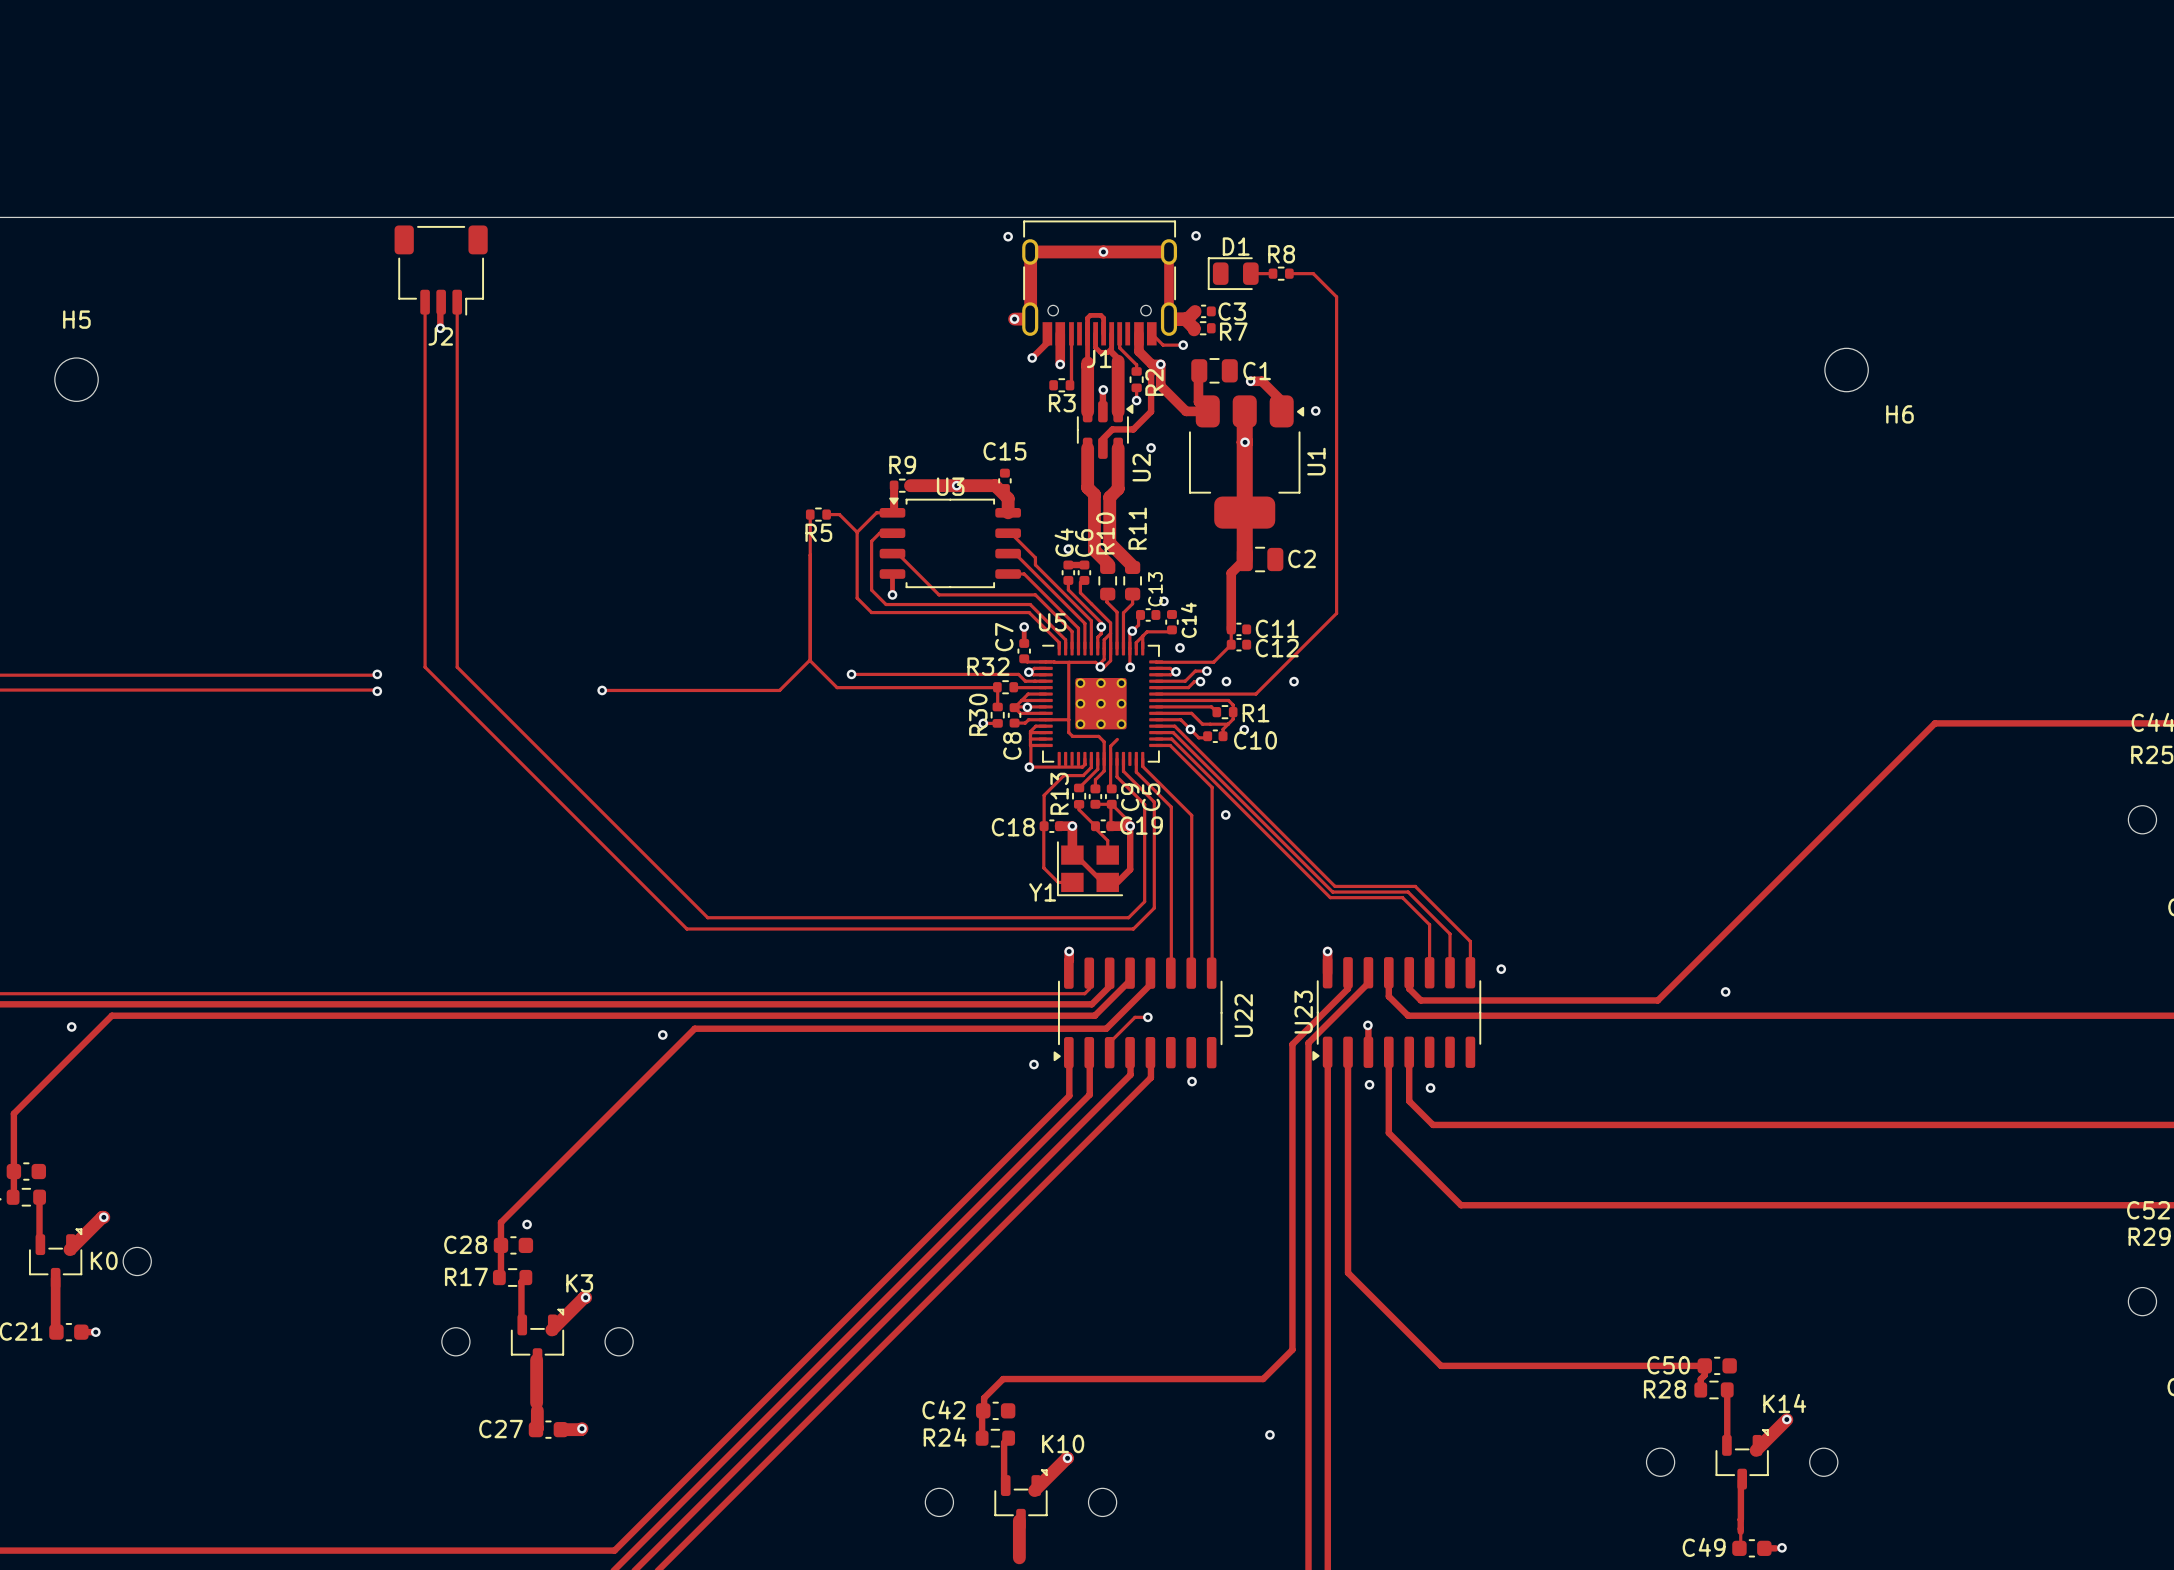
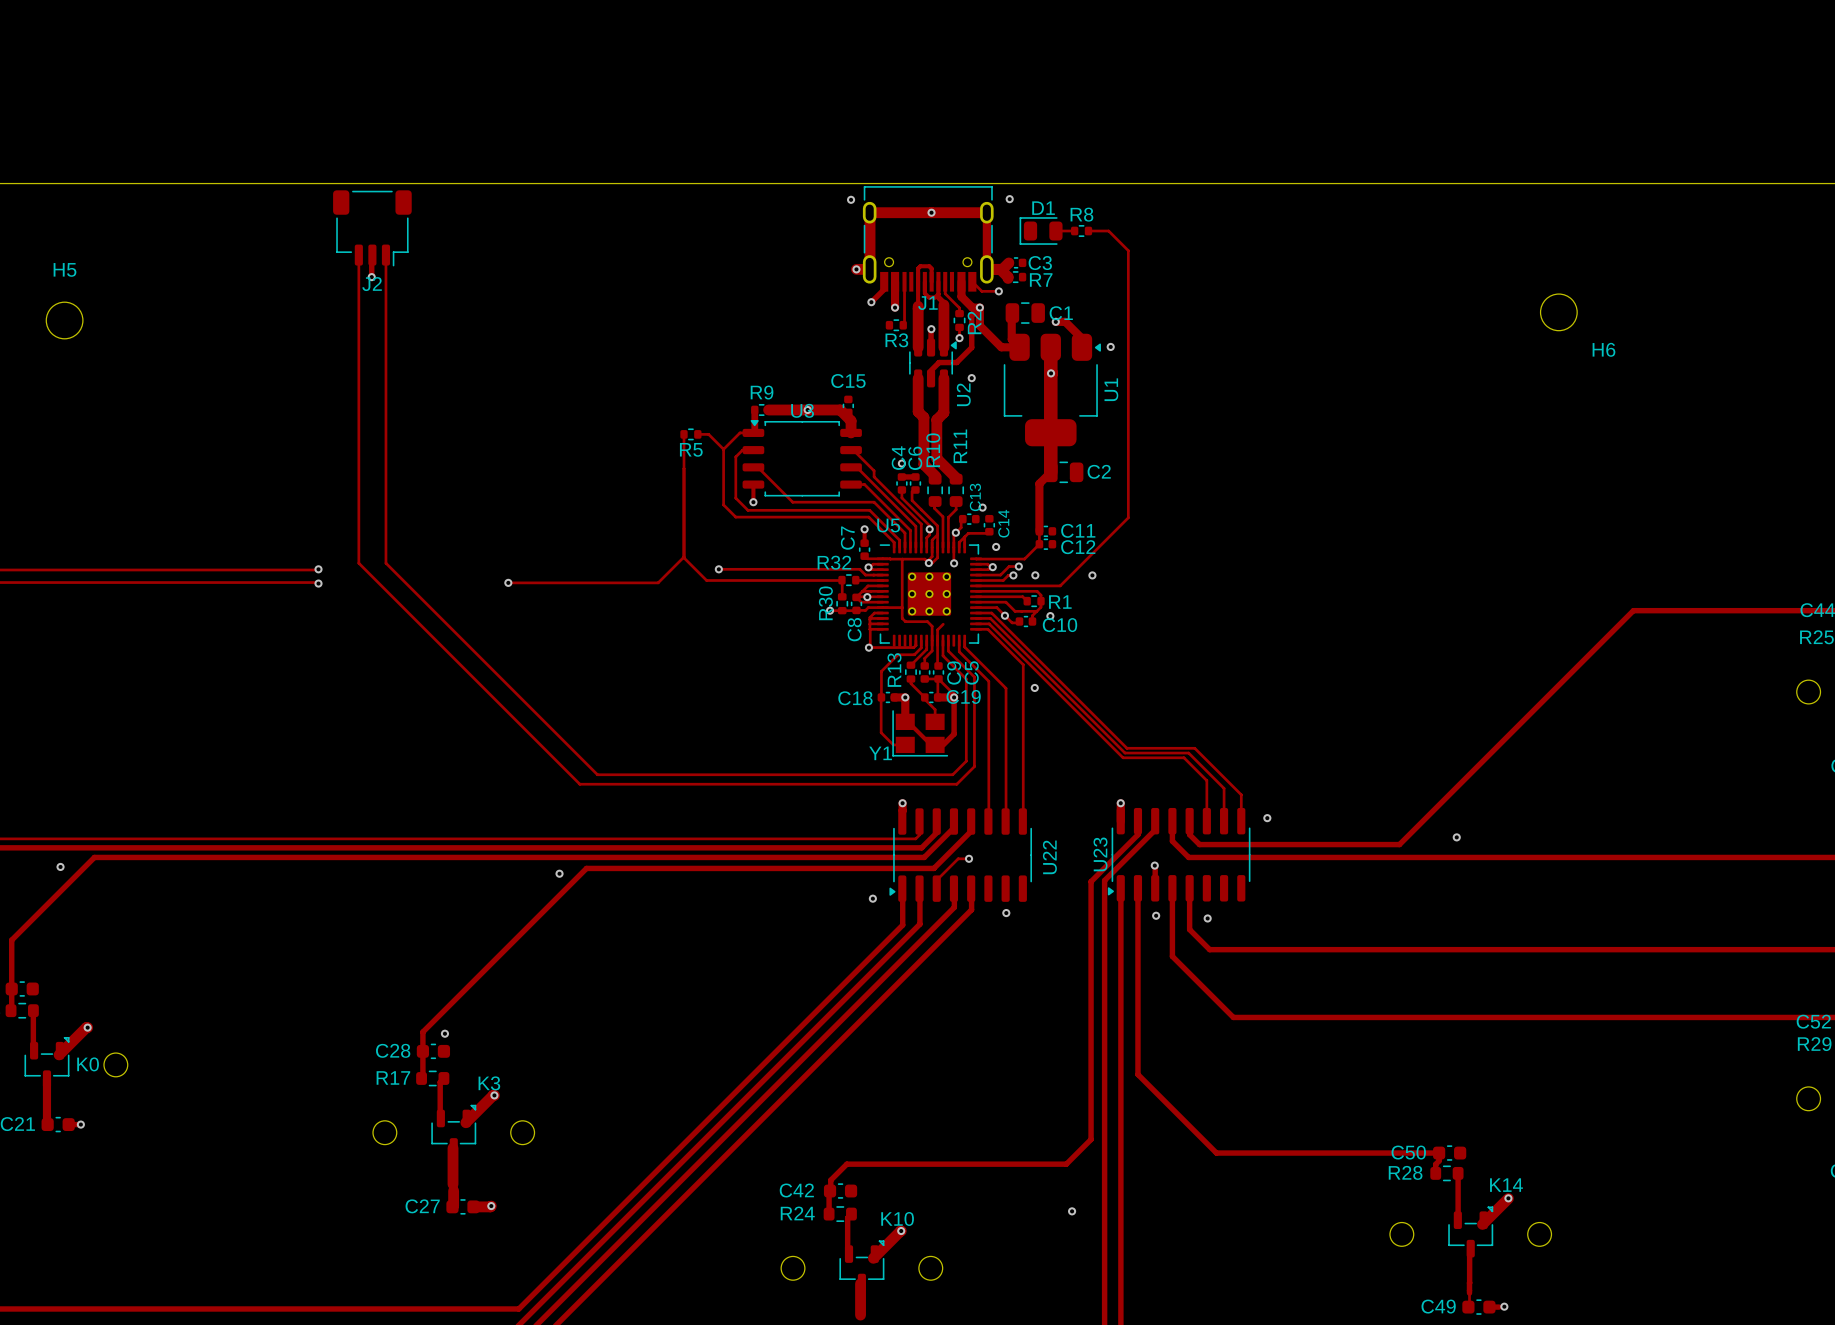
track: none -> (856, 610) (842, 610)

